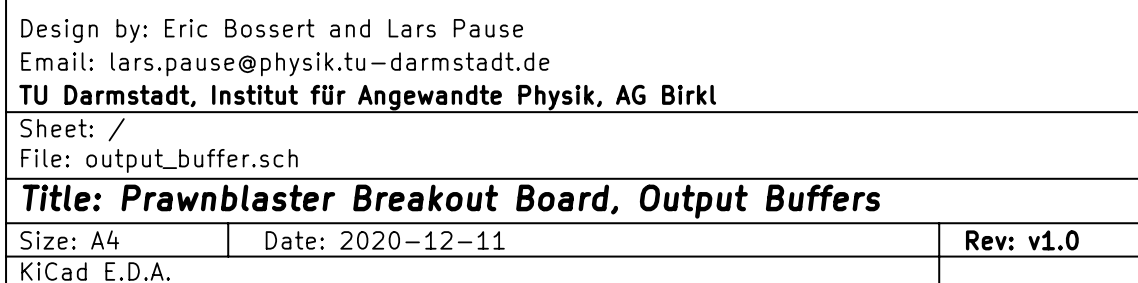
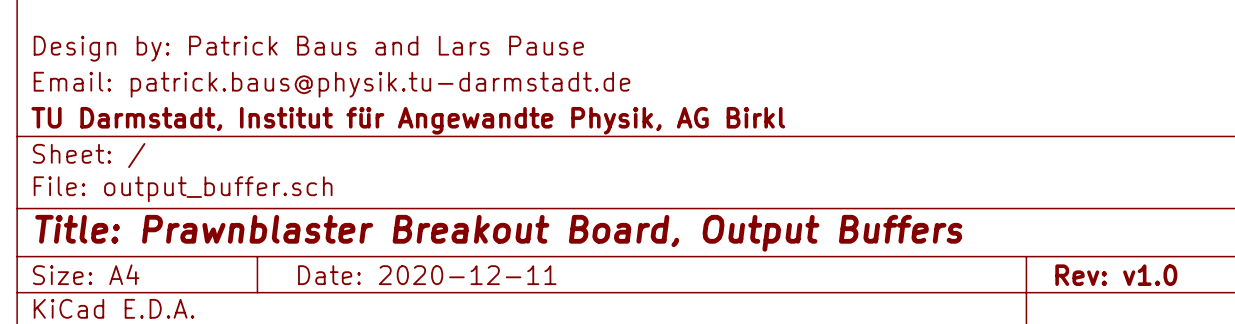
title block: Design by: Eric Bossert and Lars Pause (272, 30) -> Design by: Patrick Baus and Lars Pause (308, 48)
title block: Email: lars.pause@physik.tu-darmstadt.de (285, 64) -> Email: patrick.baus@physik.tu-darmstadt.de (332, 84)

